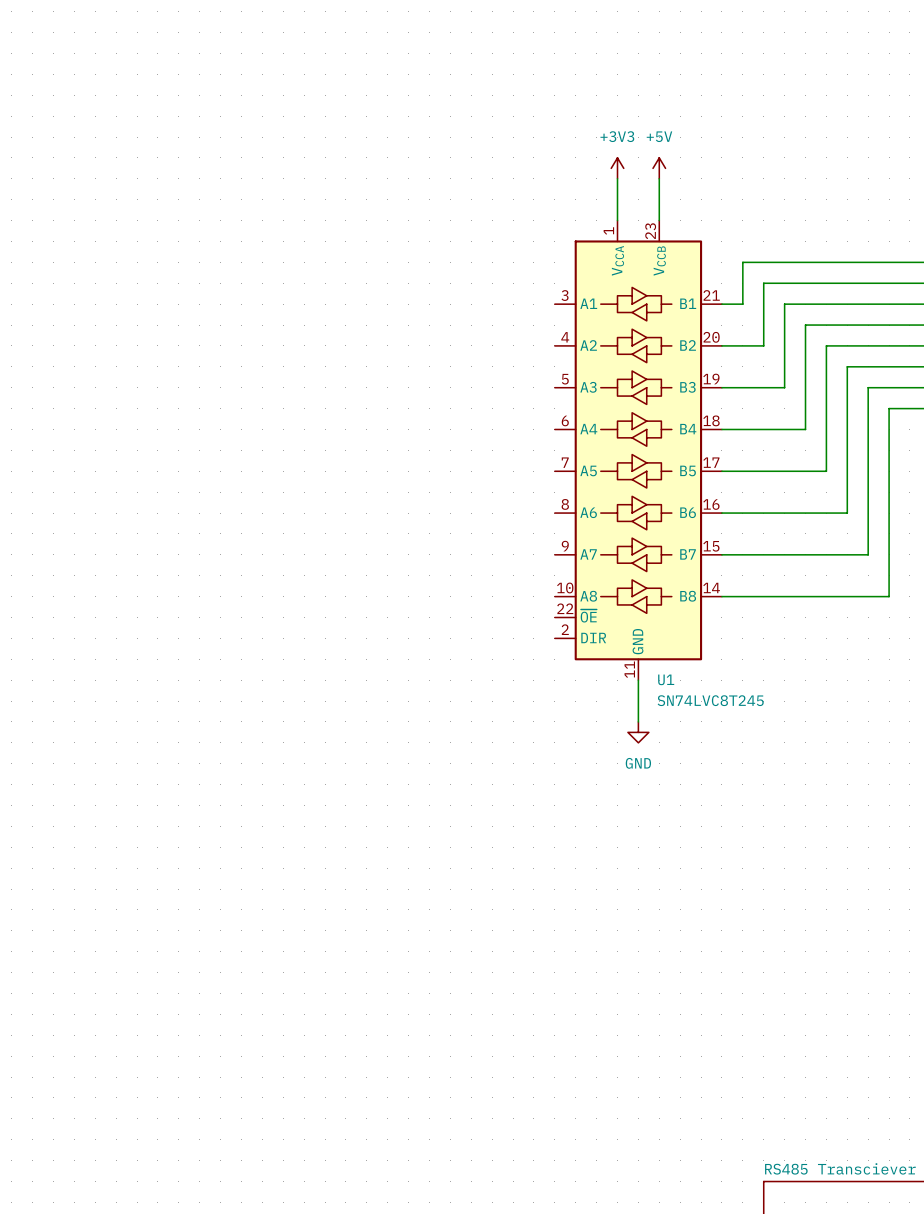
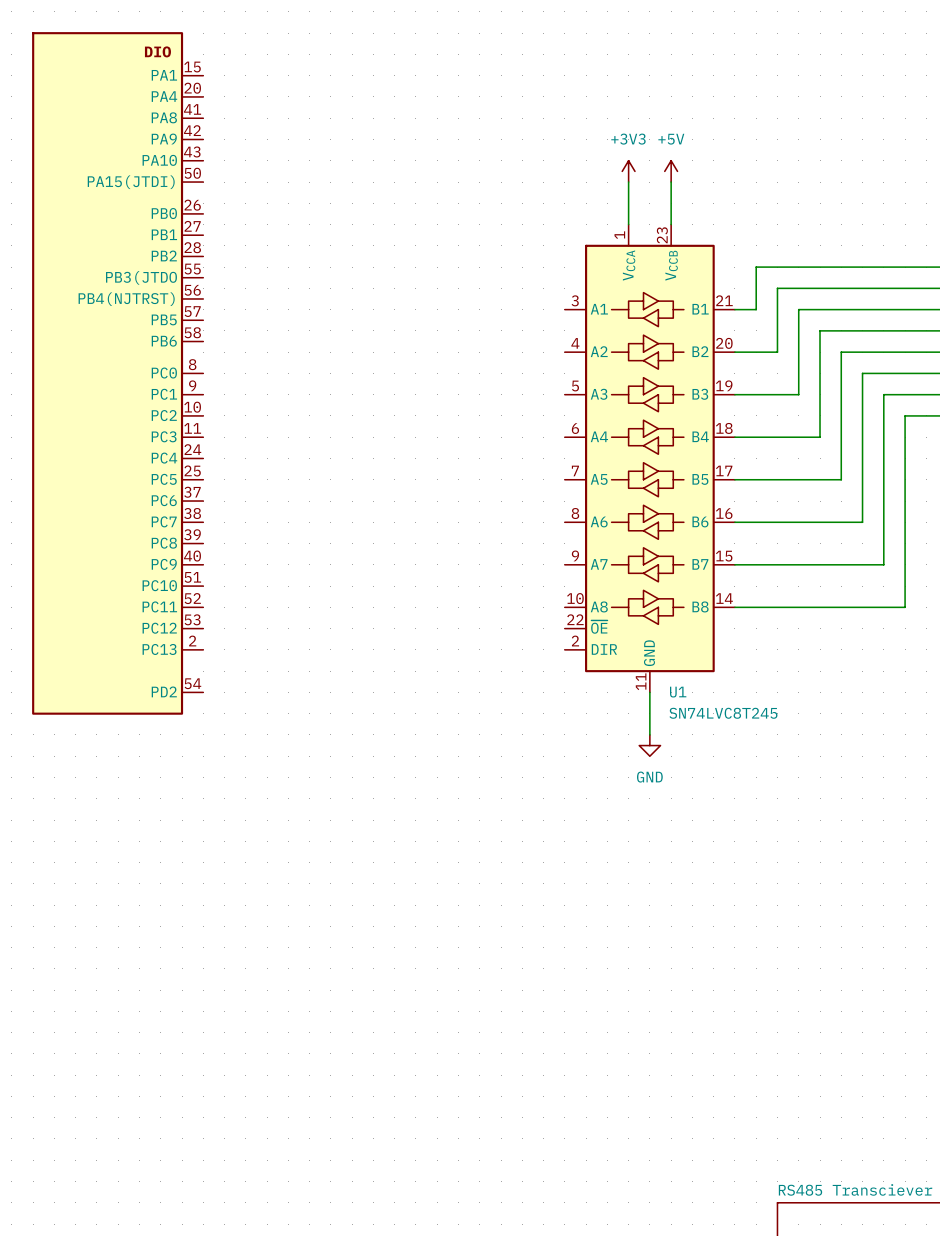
part: none -> (117, 373)

